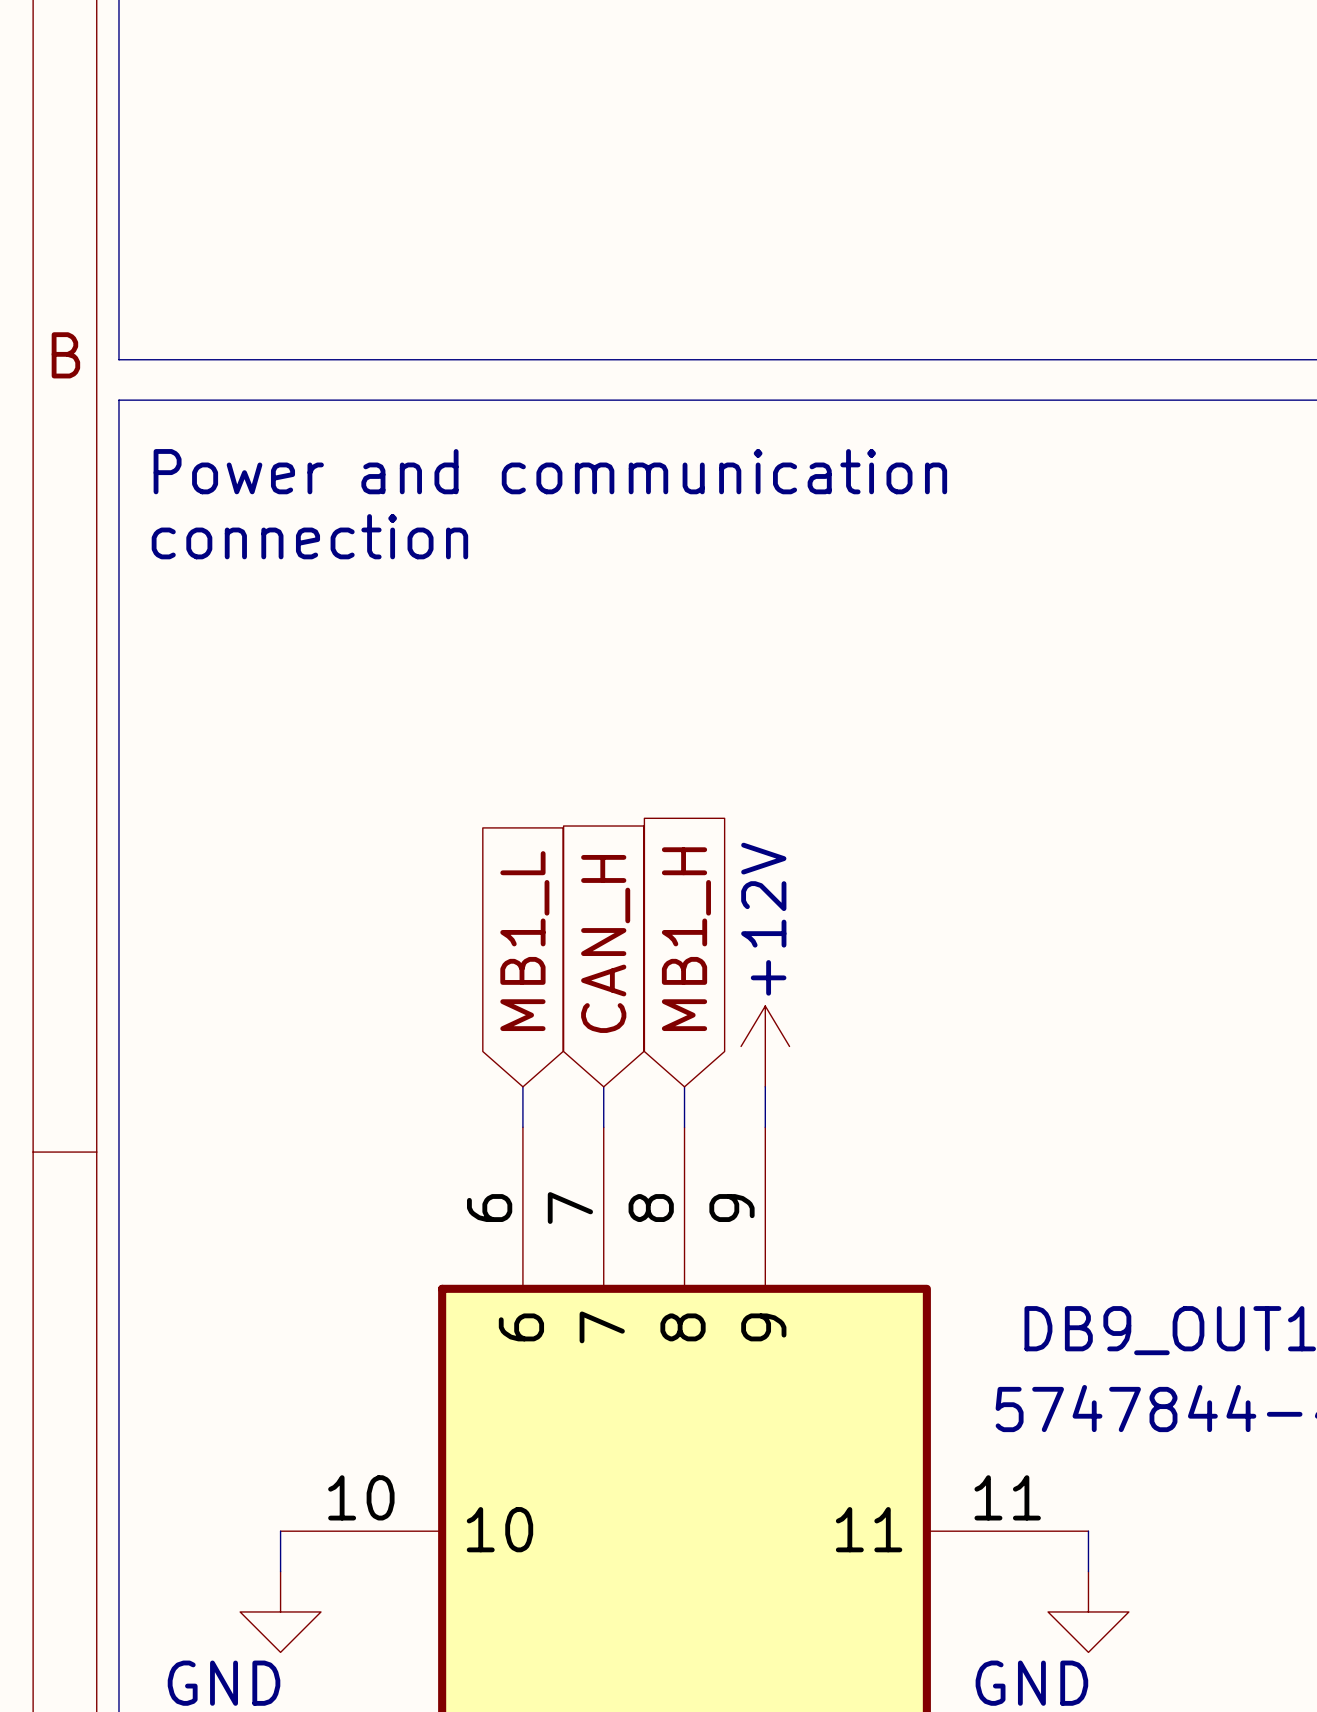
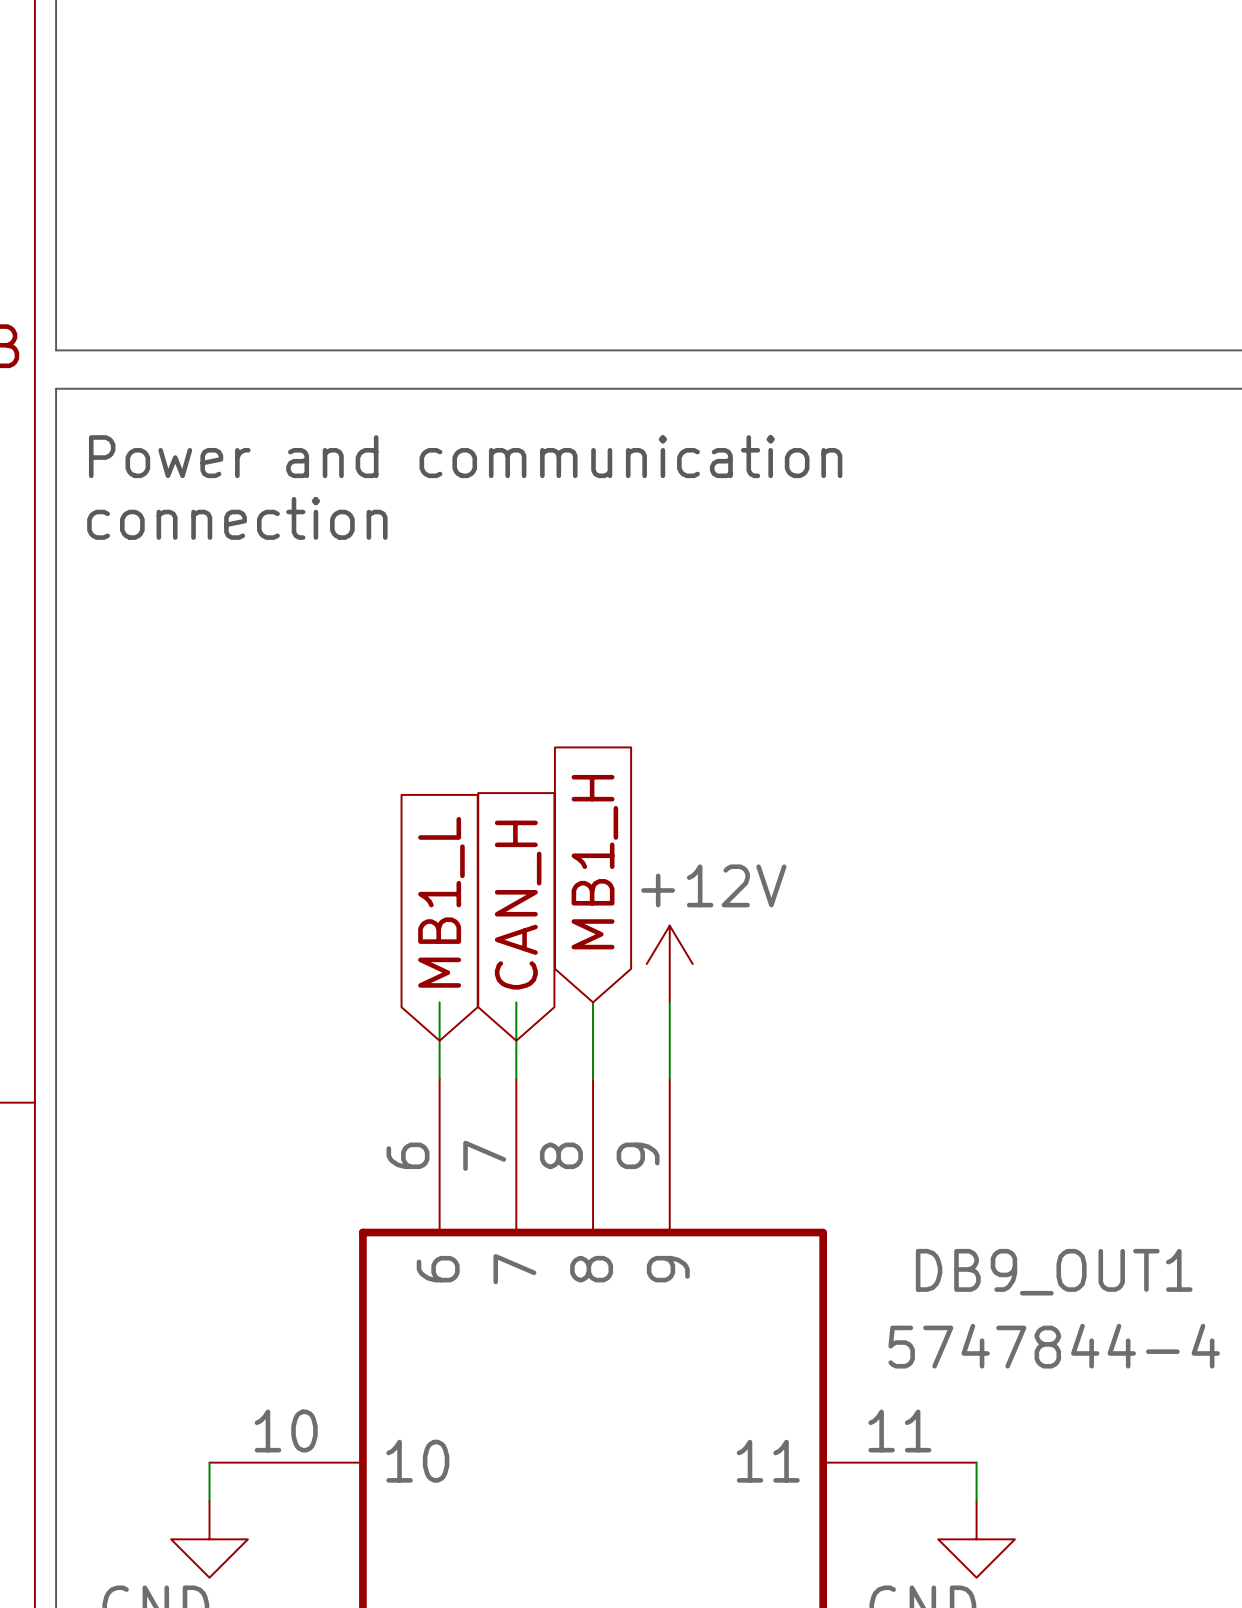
power symbol text rotation: 0° (763, 919) -> 90° clockwise (713, 885)
global label position: MB1_H (686, 939) -> MB1_H (594, 862)
wire: none -> (439, 1002) (439, 1040)
wire: none -> (516, 1002) (516, 1040)
wire: none -> (593, 1002) (593, 1040)
power symbol position: +12V (765, 1046) -> +12V (669, 964)

